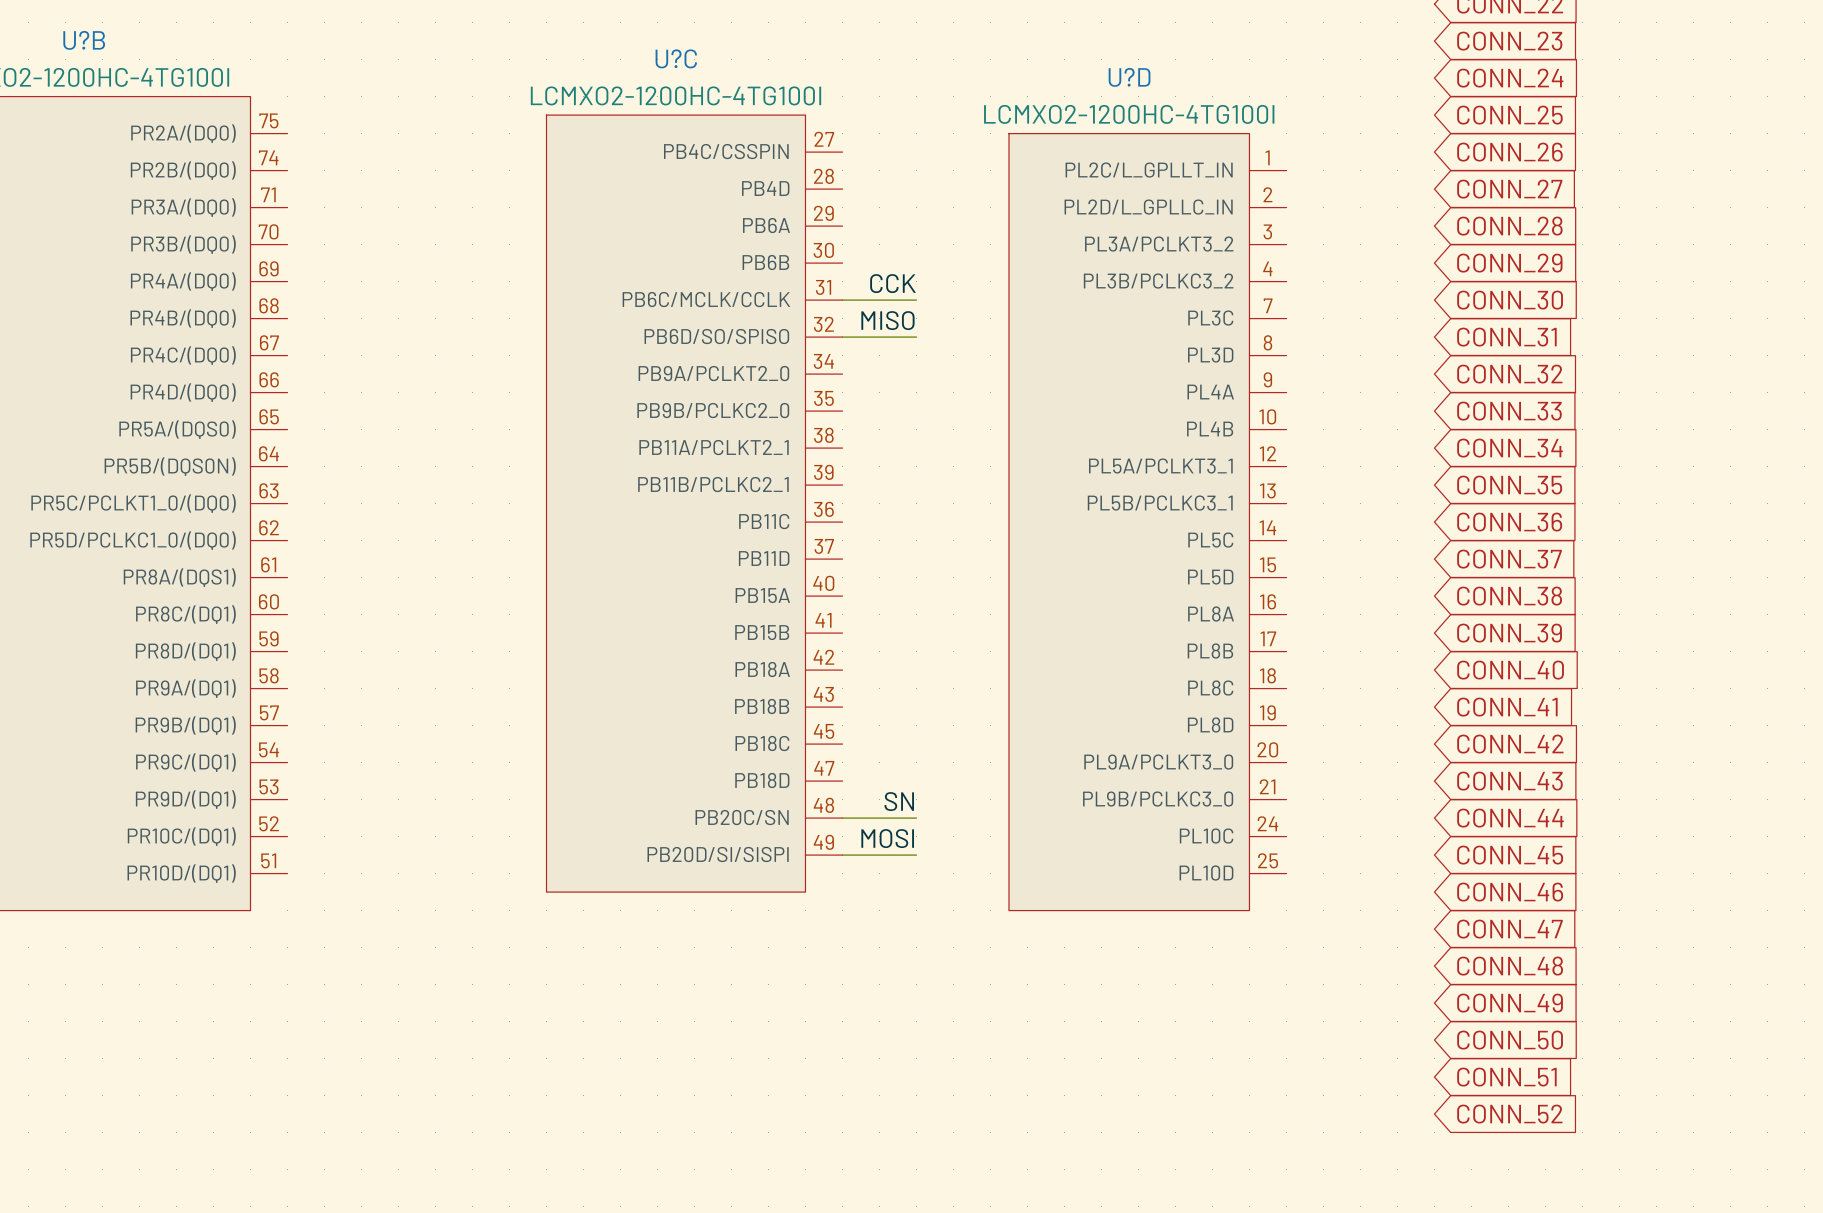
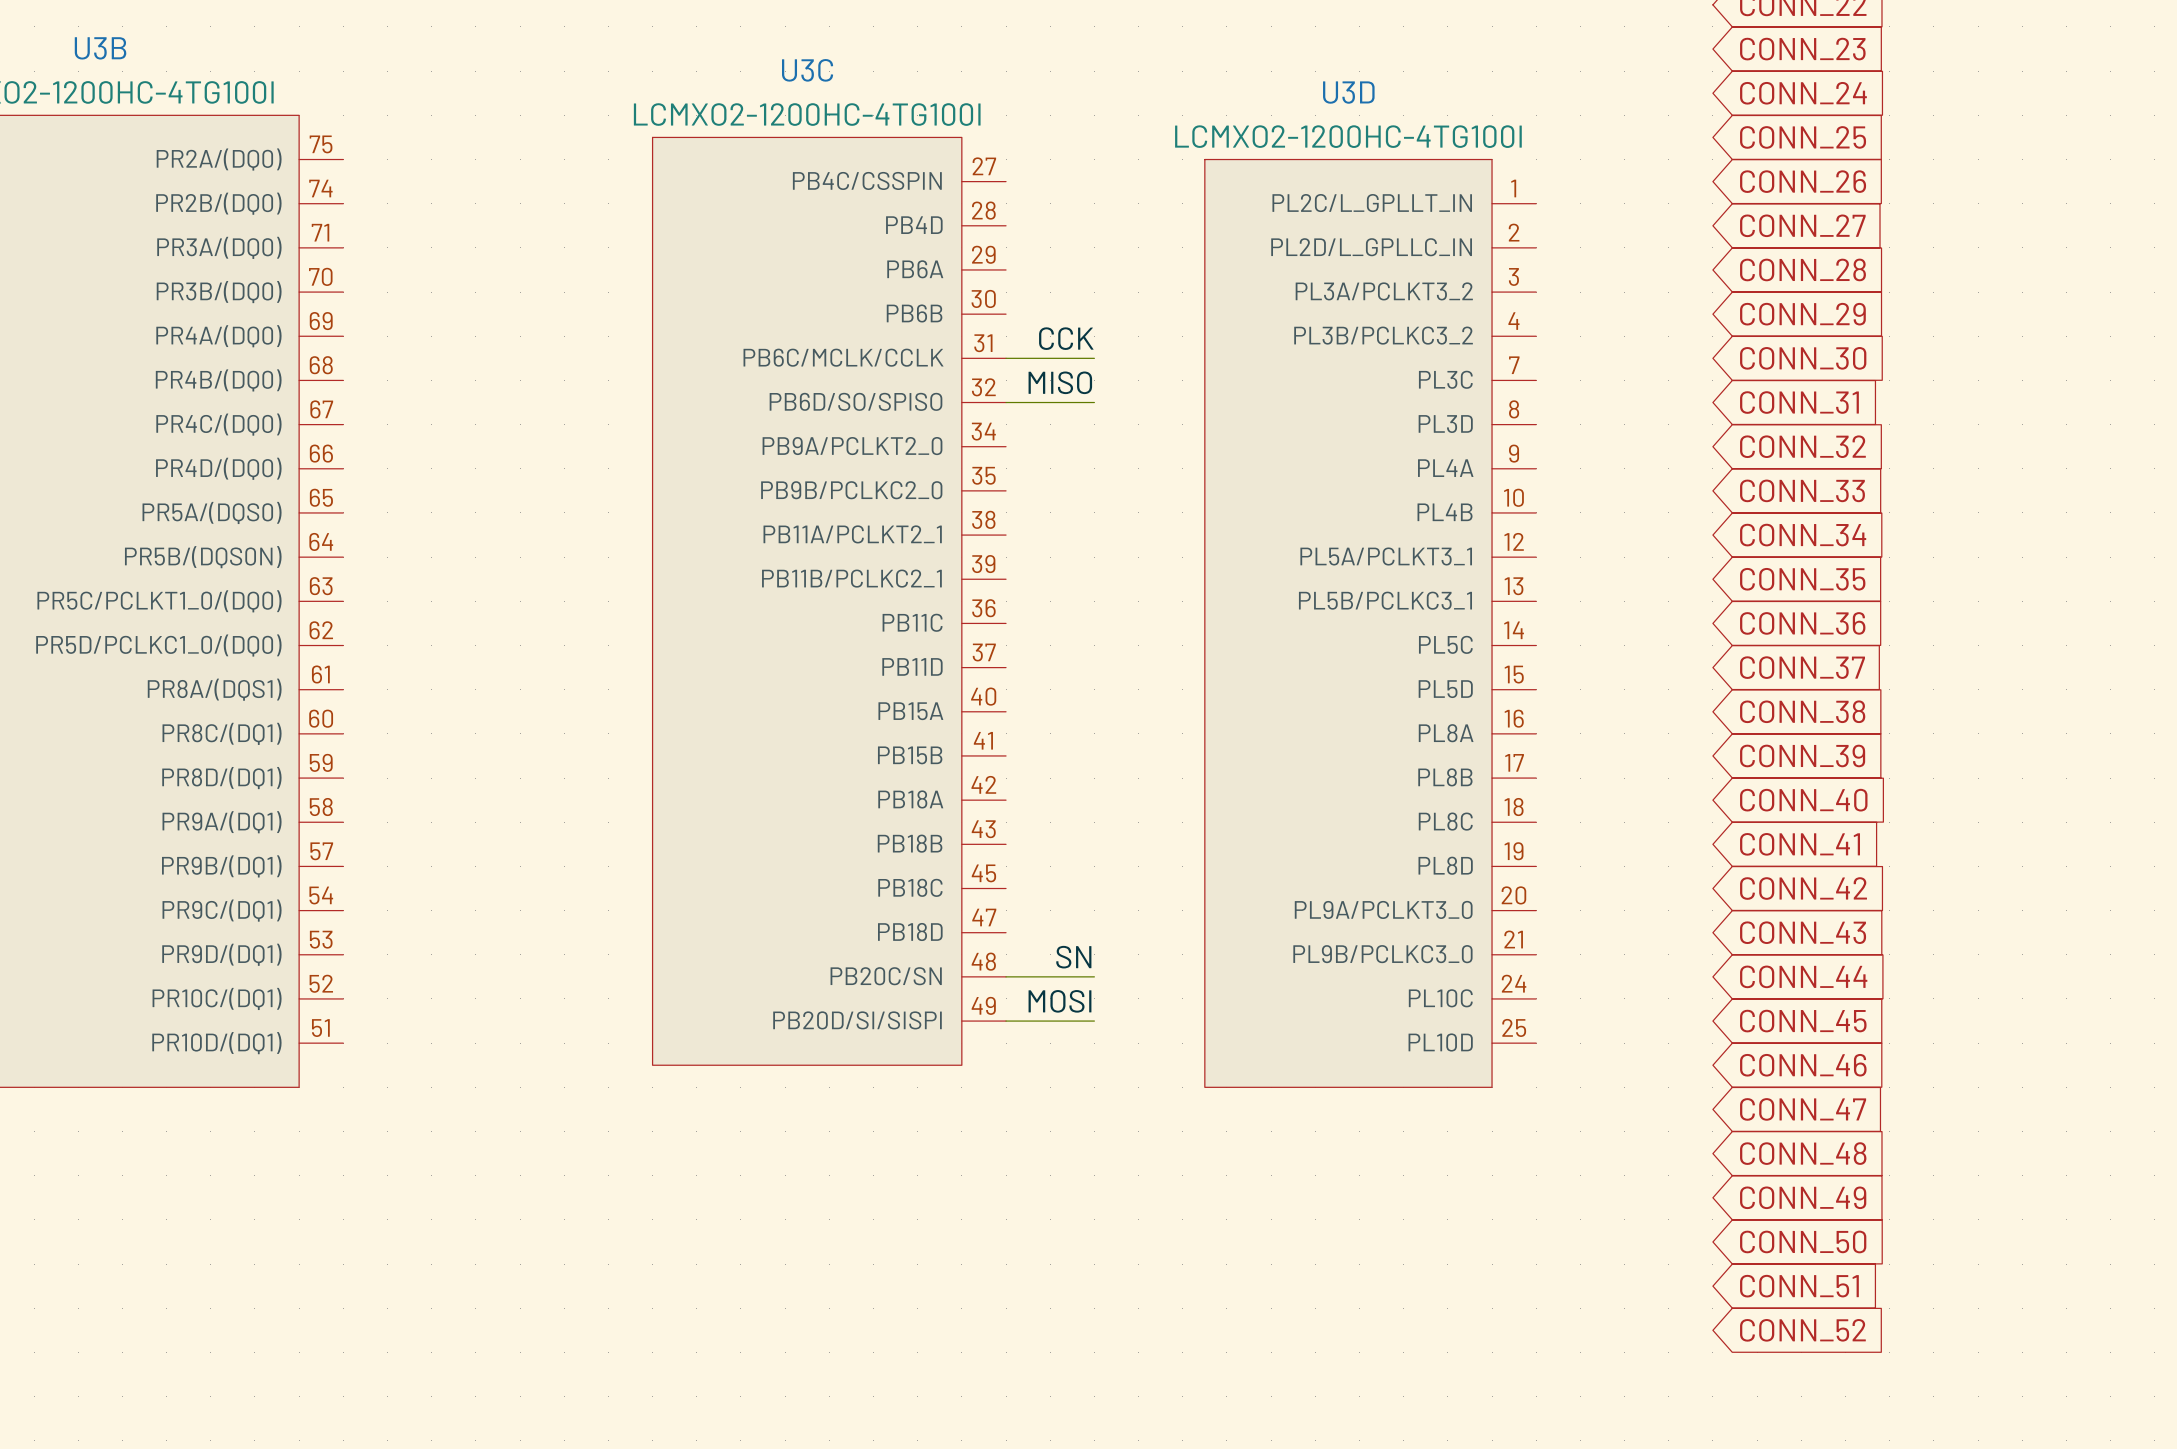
U?B name: U?B (84, 40) -> U3B (100, 48)
U?C name: U?C (676, 58) -> U3C (807, 70)
U?D name: U?D (1129, 77) -> U3D (1348, 92)

